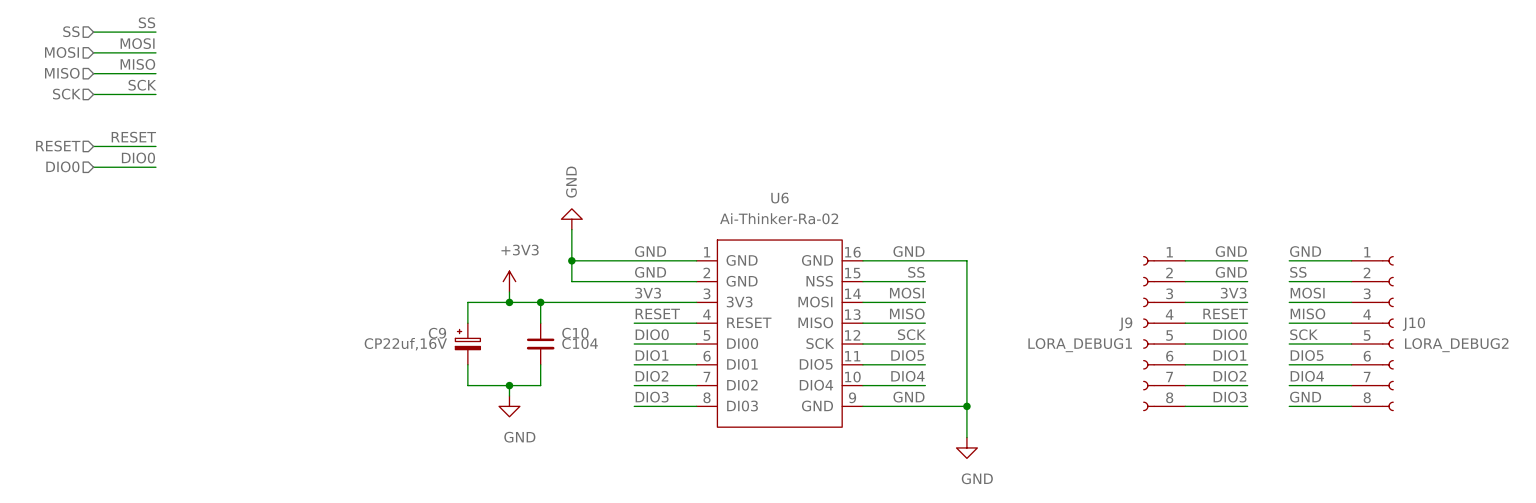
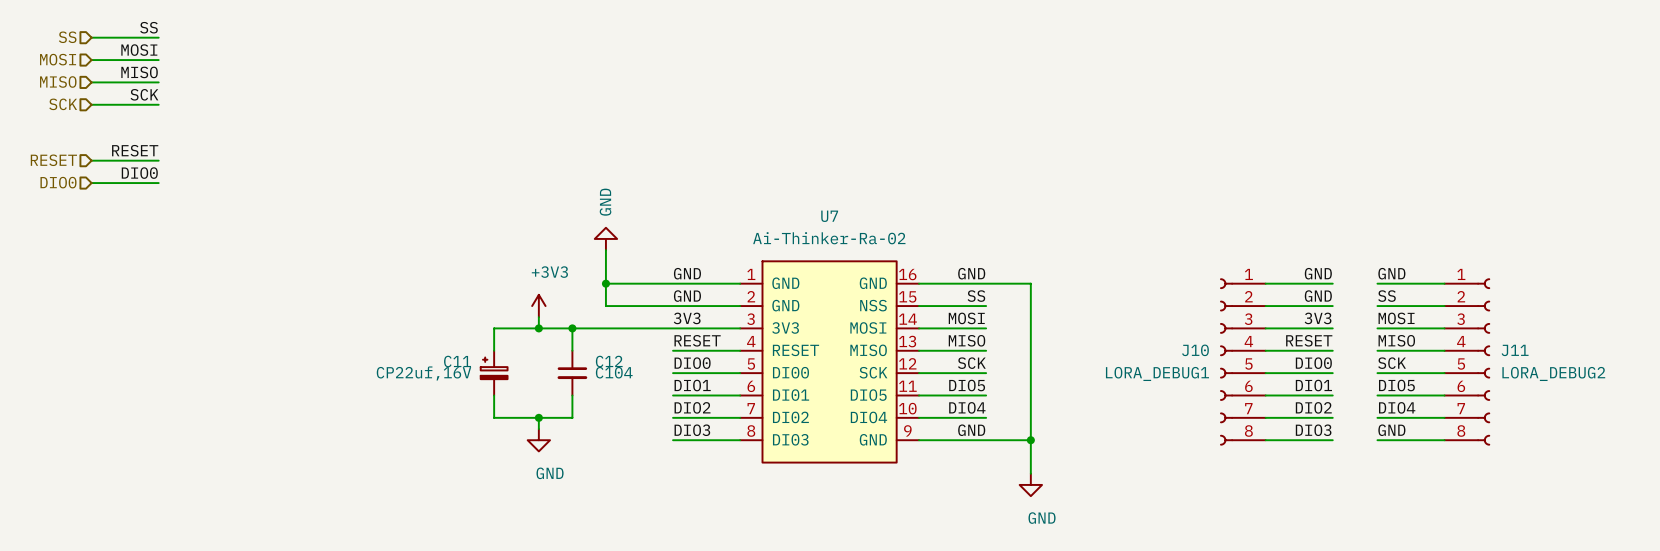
U6 name: U6 (779, 198) -> U7 (829, 216)
J9 name: J9 (1125, 324) -> J10 (1195, 350)
J10 name: J10 (1413, 324) -> J11 (1515, 350)
C9 name: C9 (437, 333) -> C11 (457, 361)
C10 name: C10 (575, 333) -> C12 (609, 361)

